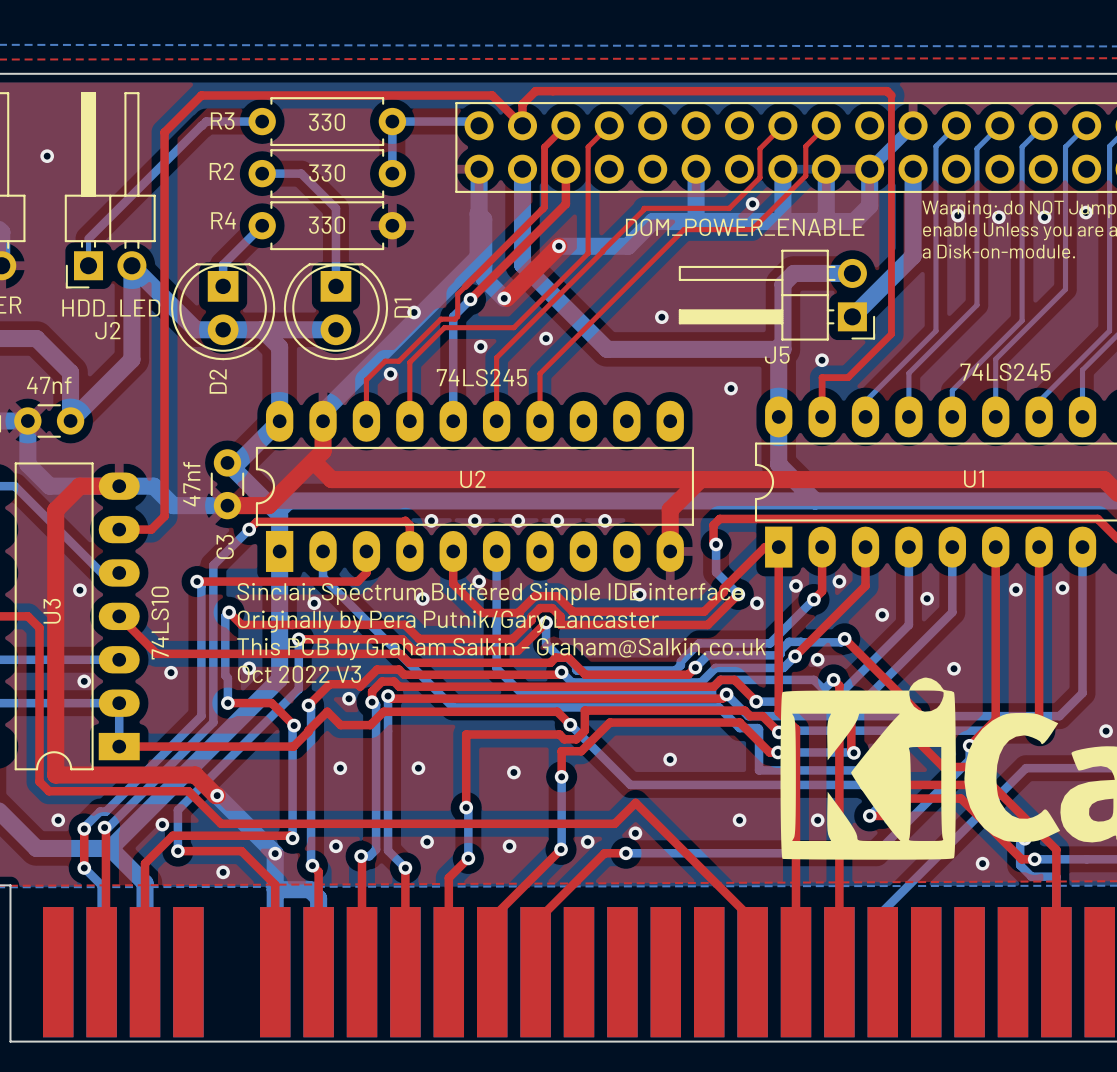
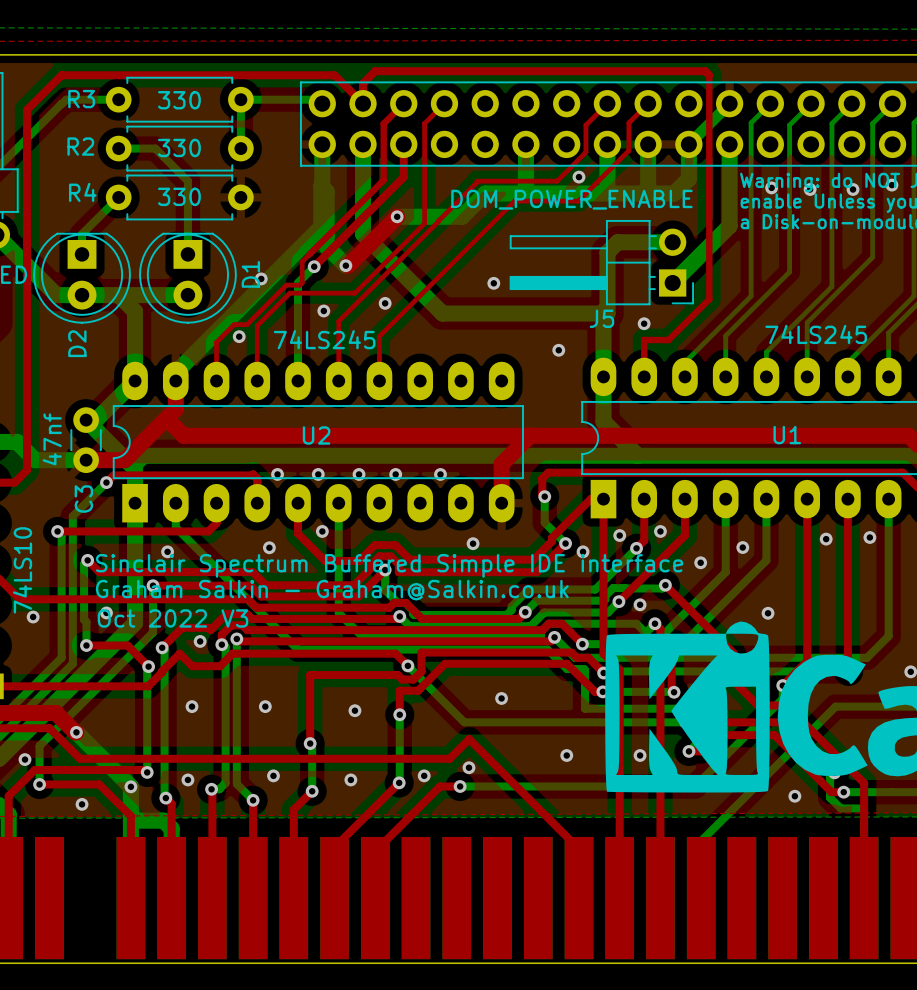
text: Sinclair Spectrum Buffered Simple IDE interface (490, 593) -> none
text: Originally by Pera Putnik/Gary Lancaster (448, 621) -> Sinclair Spectrum Buffered Simple IDE interface (389, 565)
text: This PCB by Graham Salkin - Graham@Salkin.co.uk (501, 649) -> Graham Salkin - Graham@Salkin.co.uk (332, 590)

